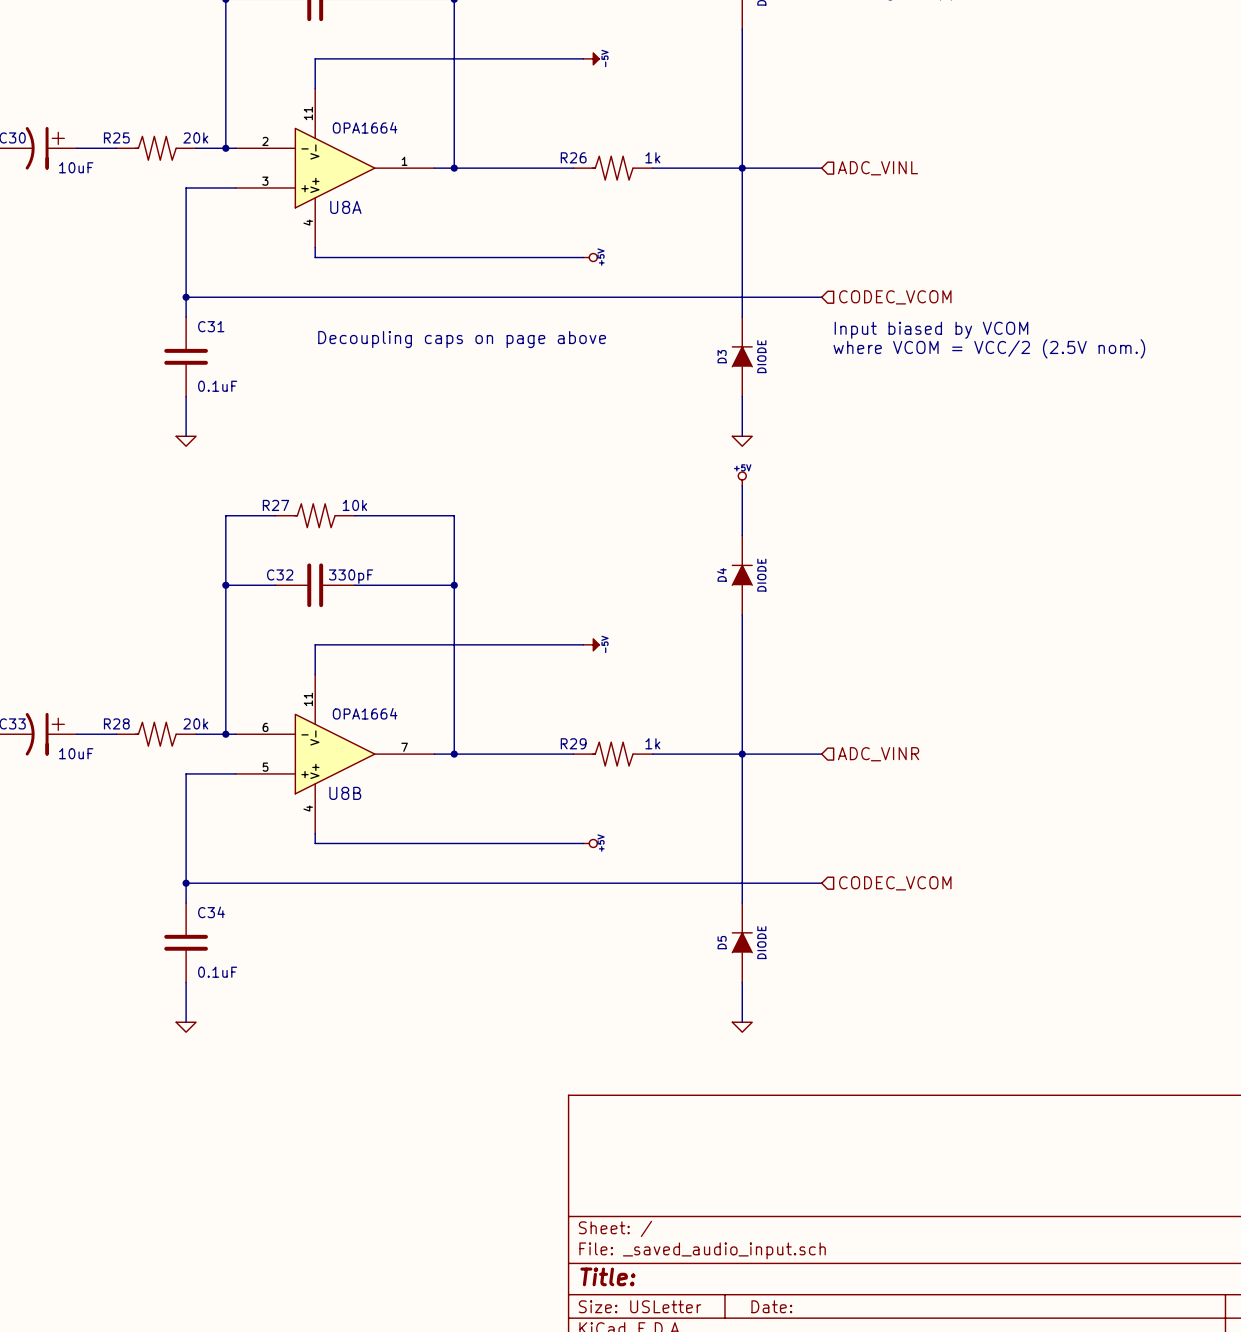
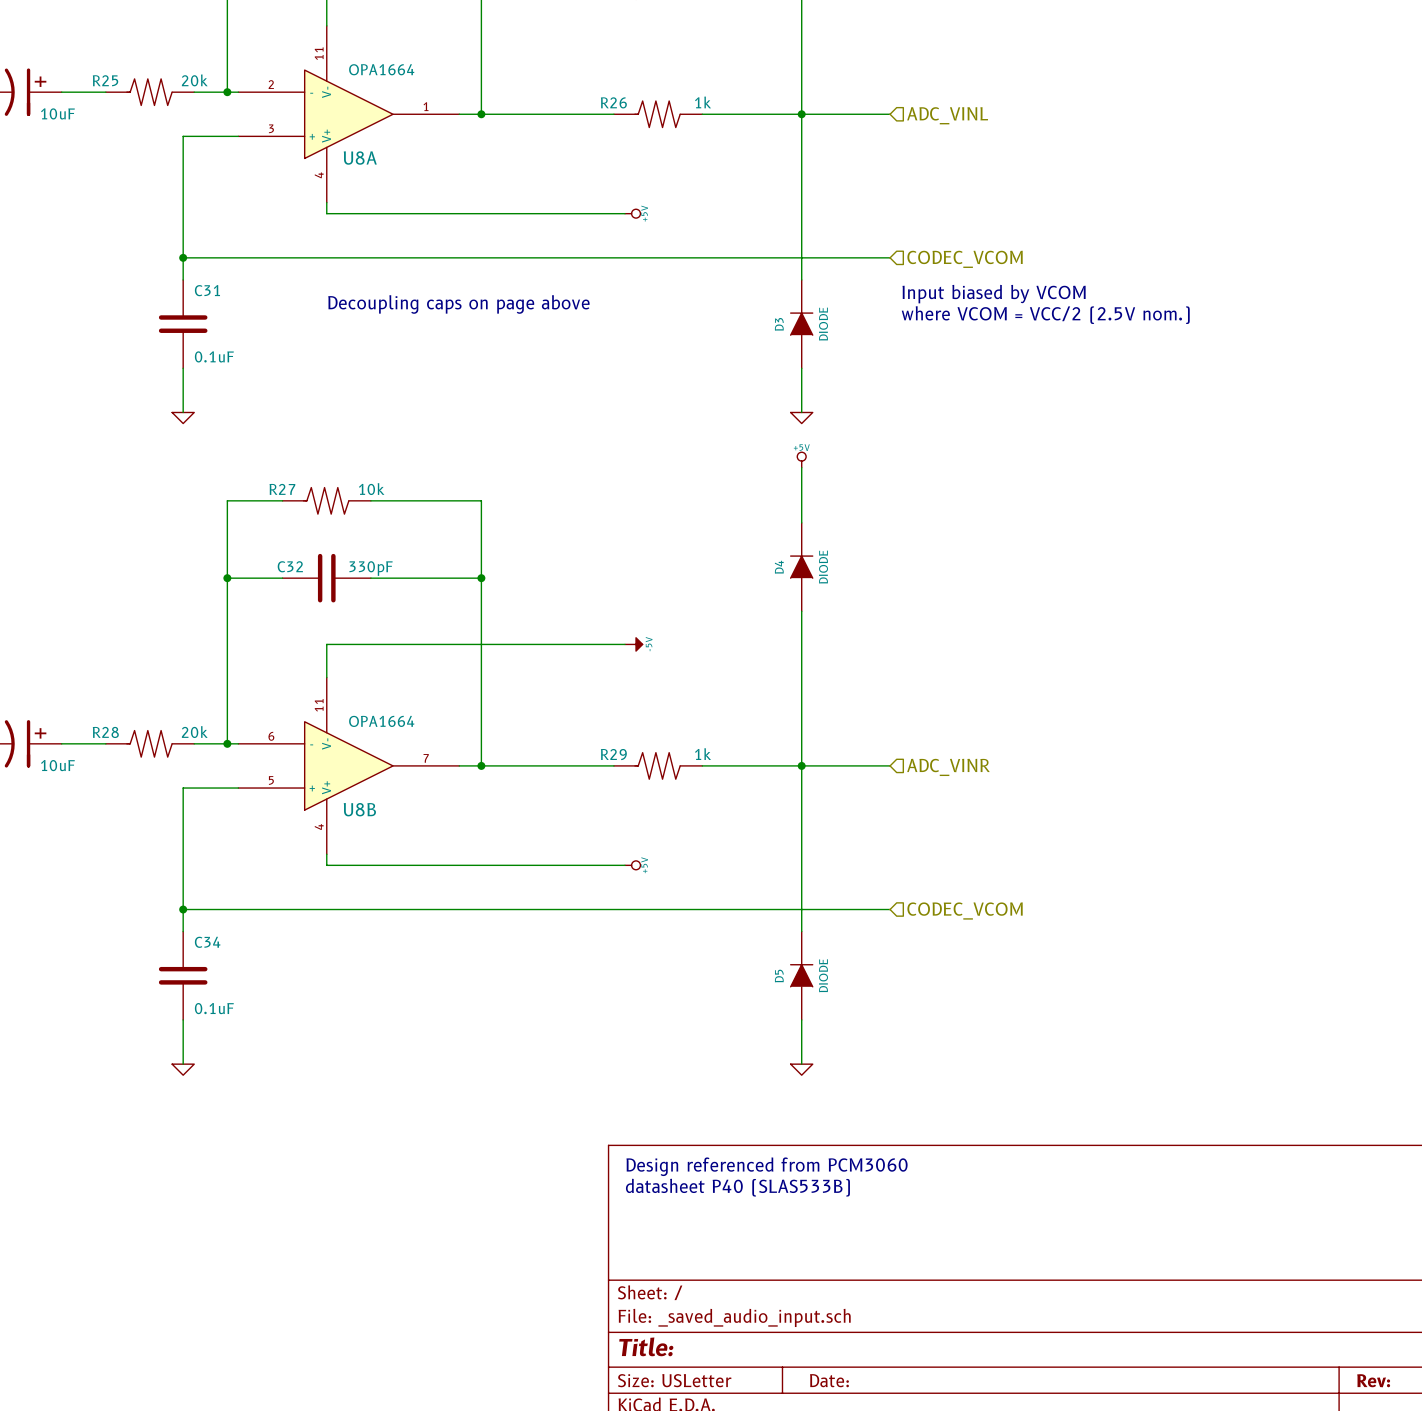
text: none -> Design referenced from PCM3060 (767, 1166)
text: none -> datasheet P40 (SLAS533B) (737, 1187)

